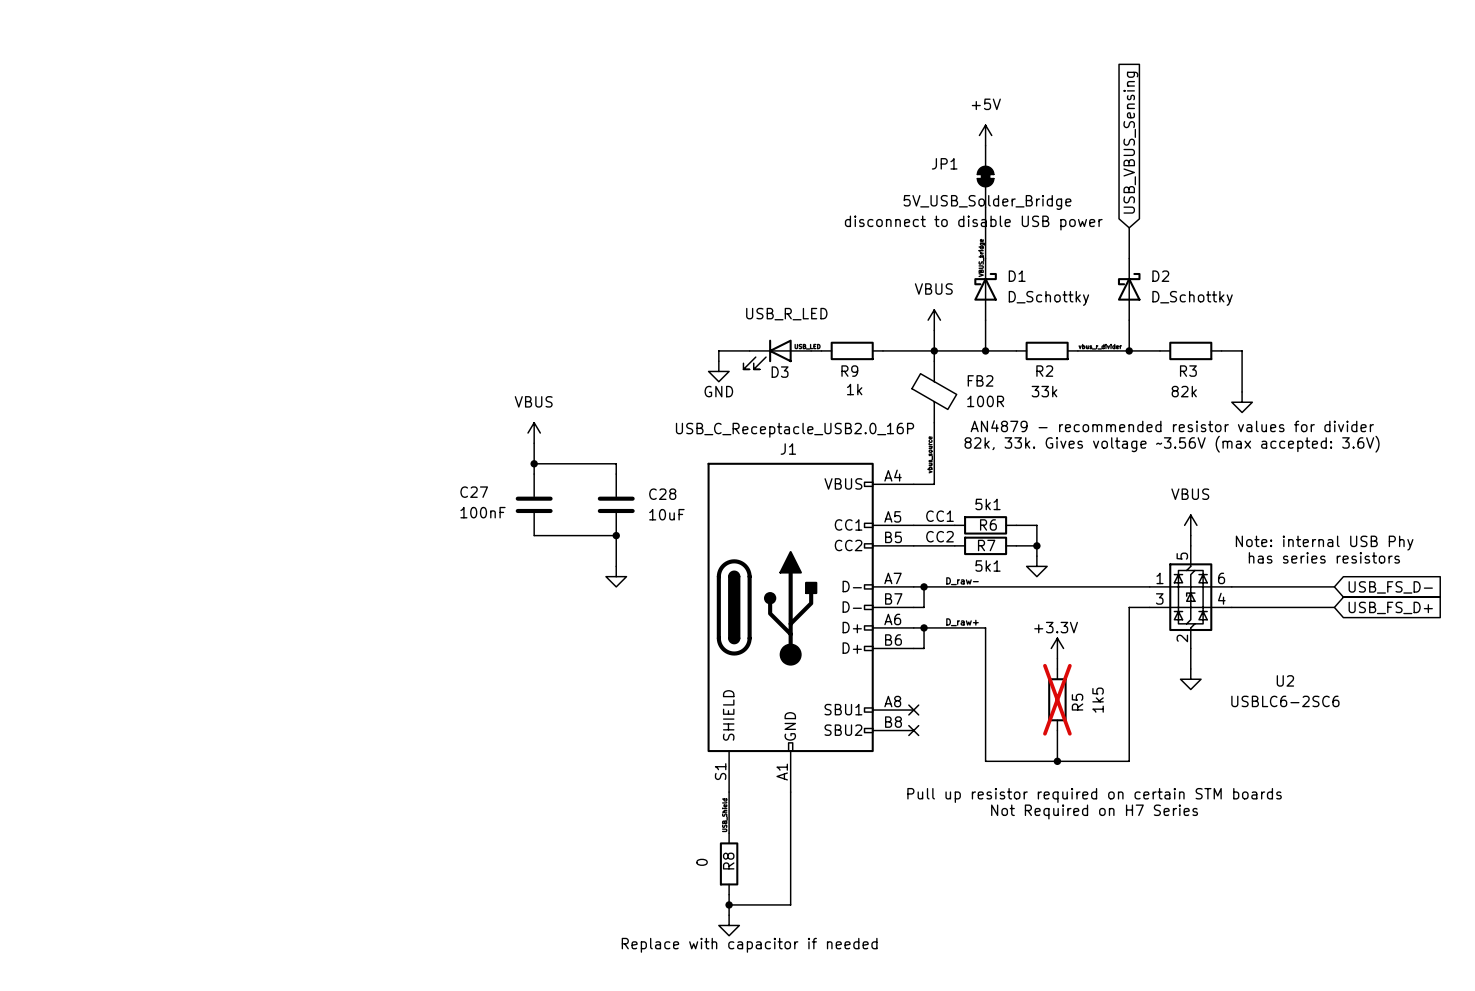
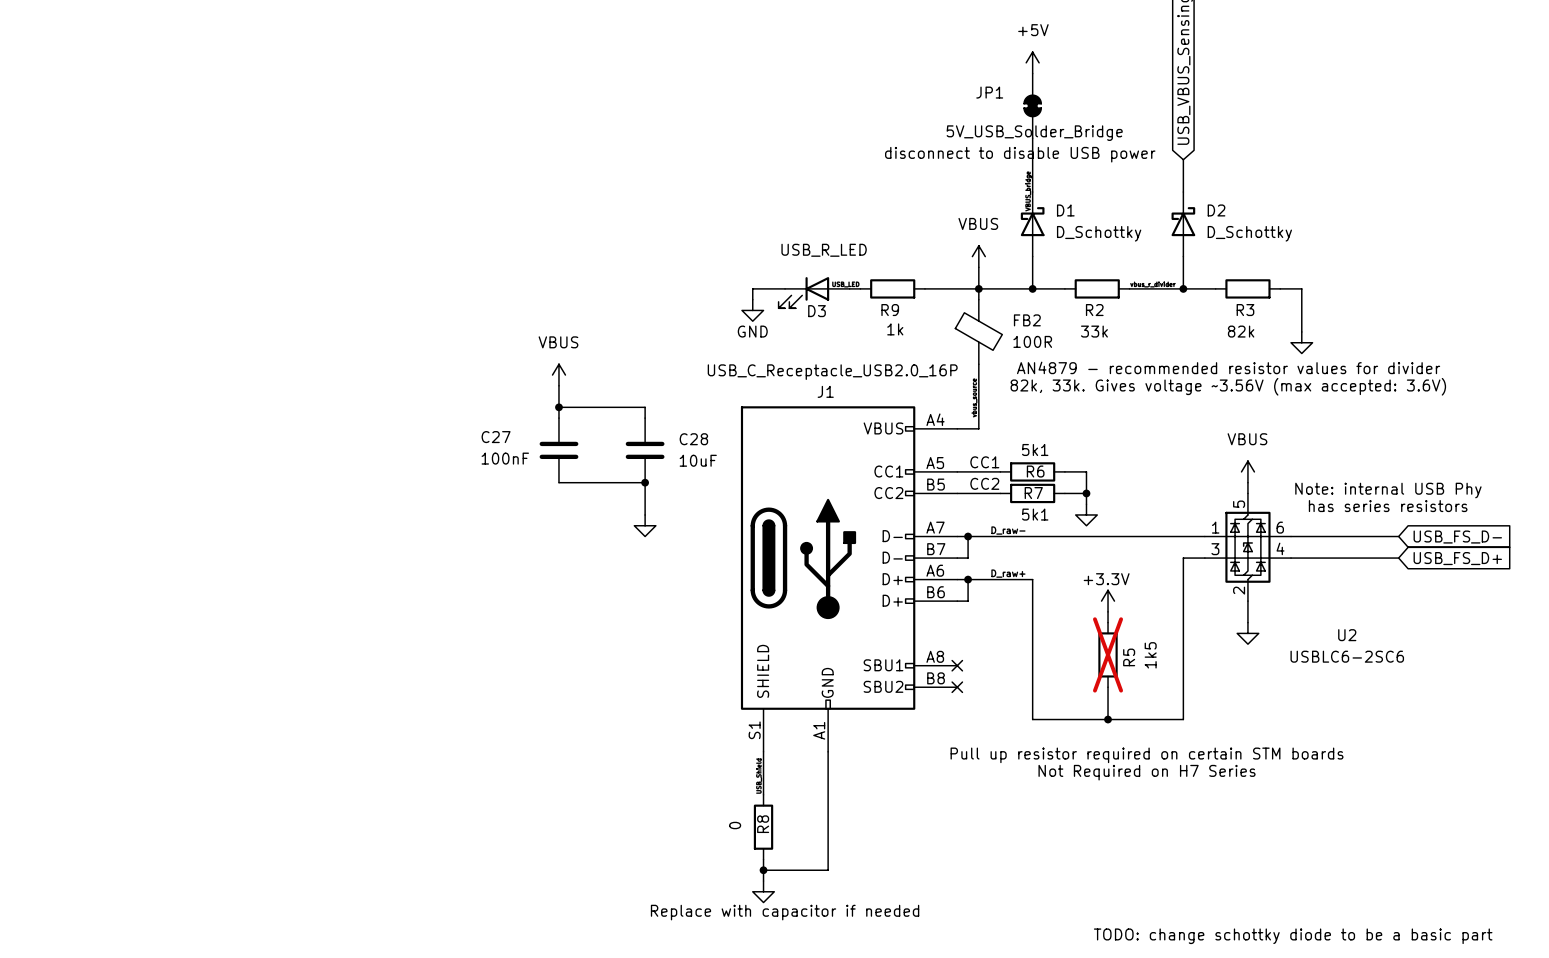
text: none -> TODO: change schottky diode to be a basic part (1293, 936)

